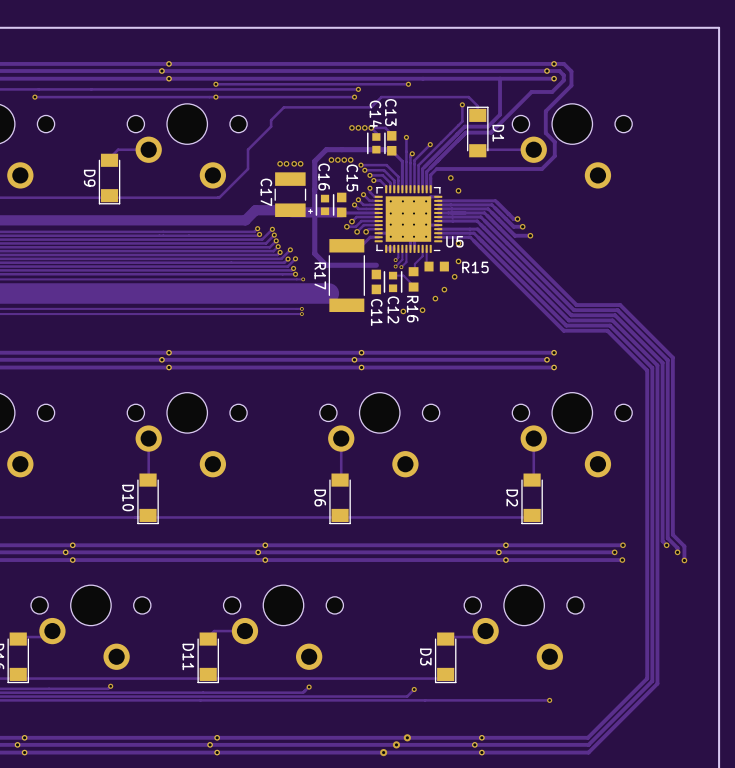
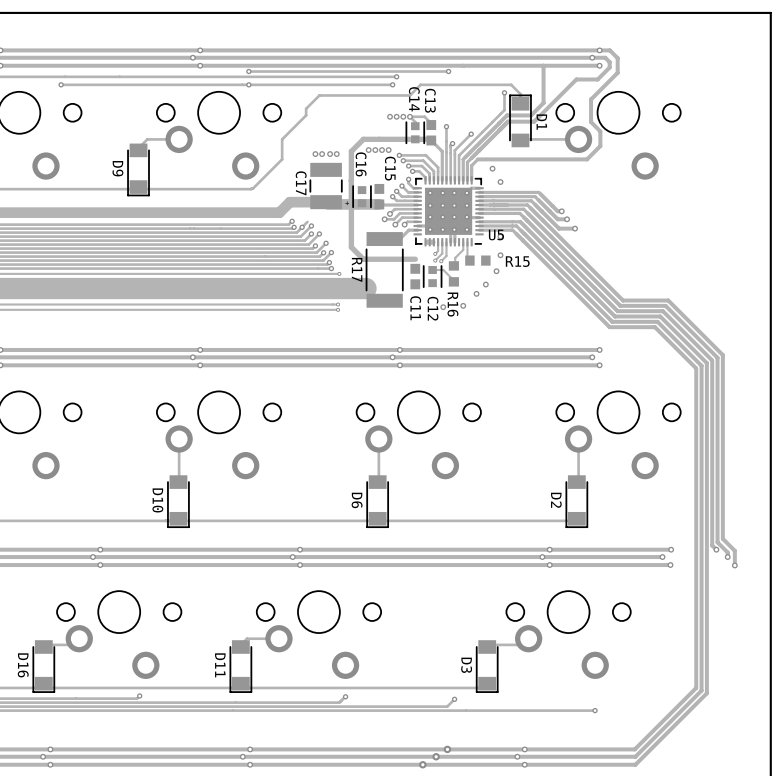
via: (272, 229) -> none
via: none -> (311, 225)
via: none -> (302, 227)
via: (274, 235) -> none
track: none -> (319, 233) (313, 239)
via: none -> (319, 233)
via: (278, 246) -> none

